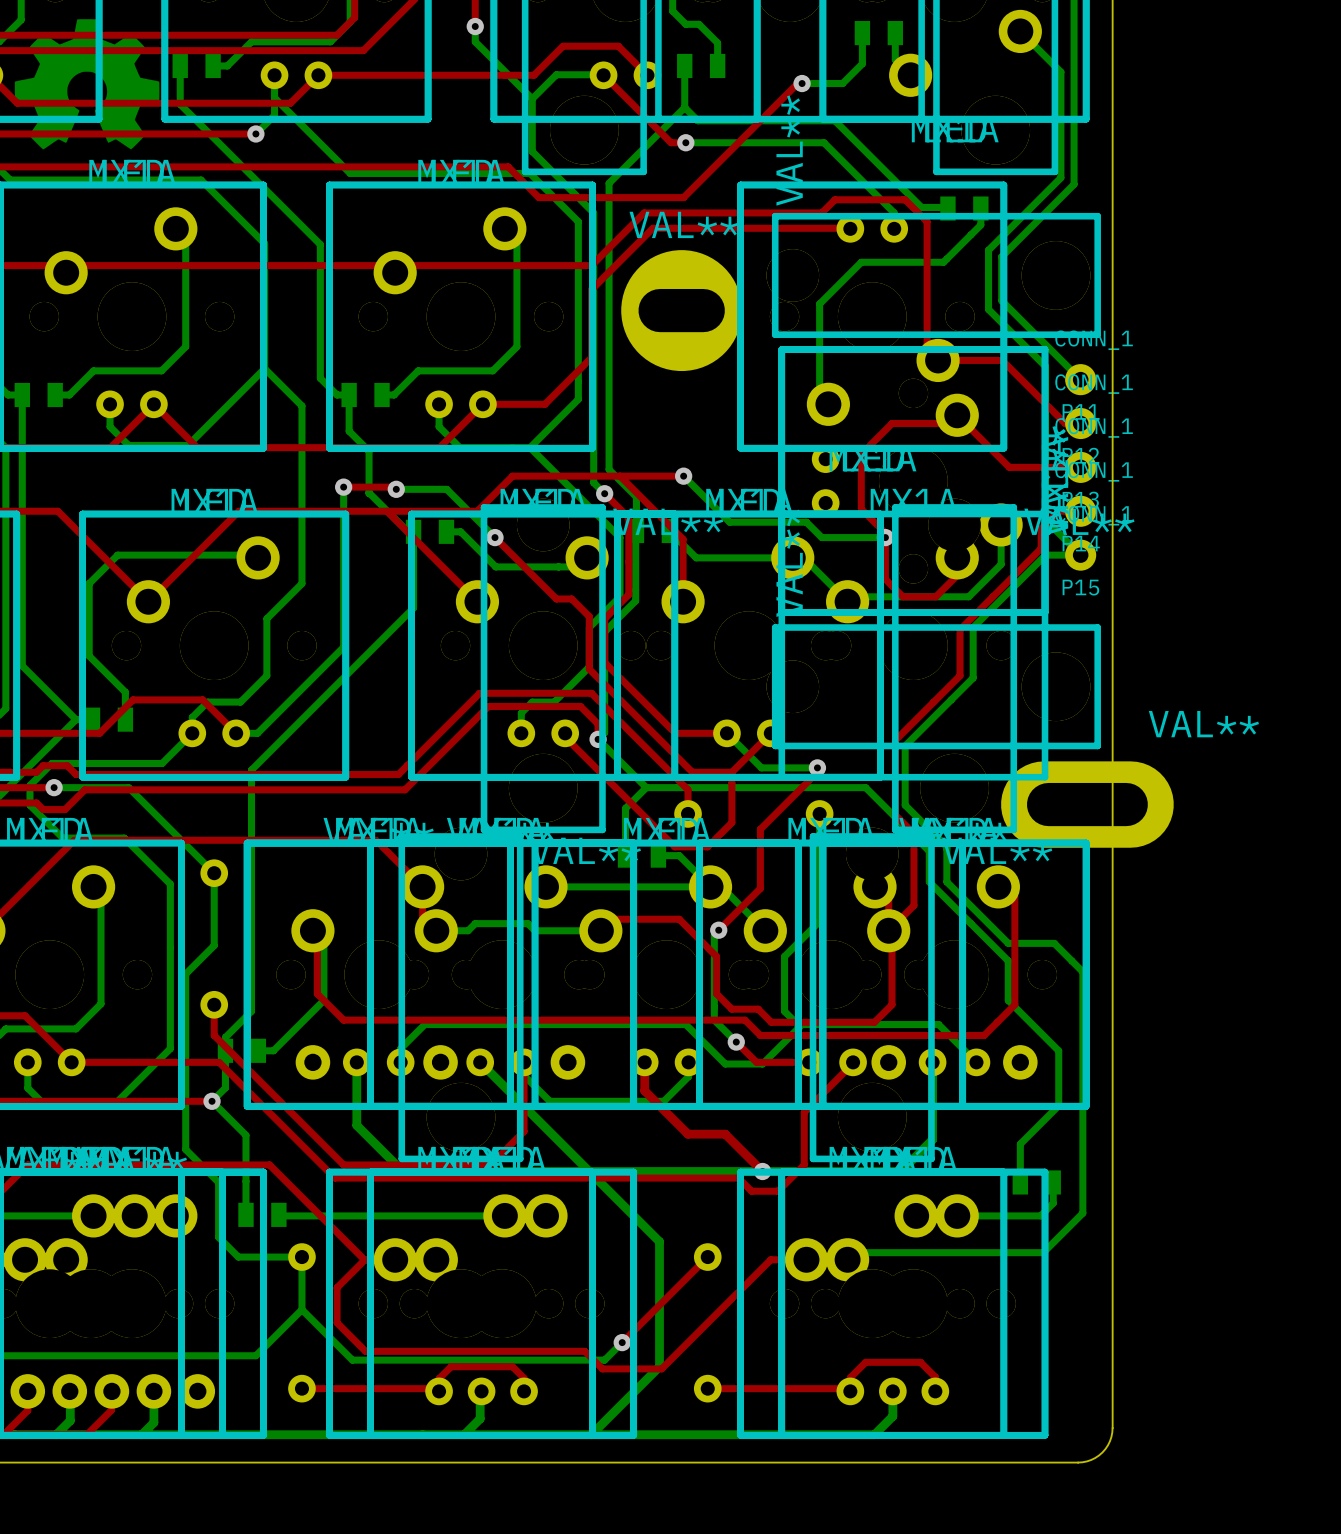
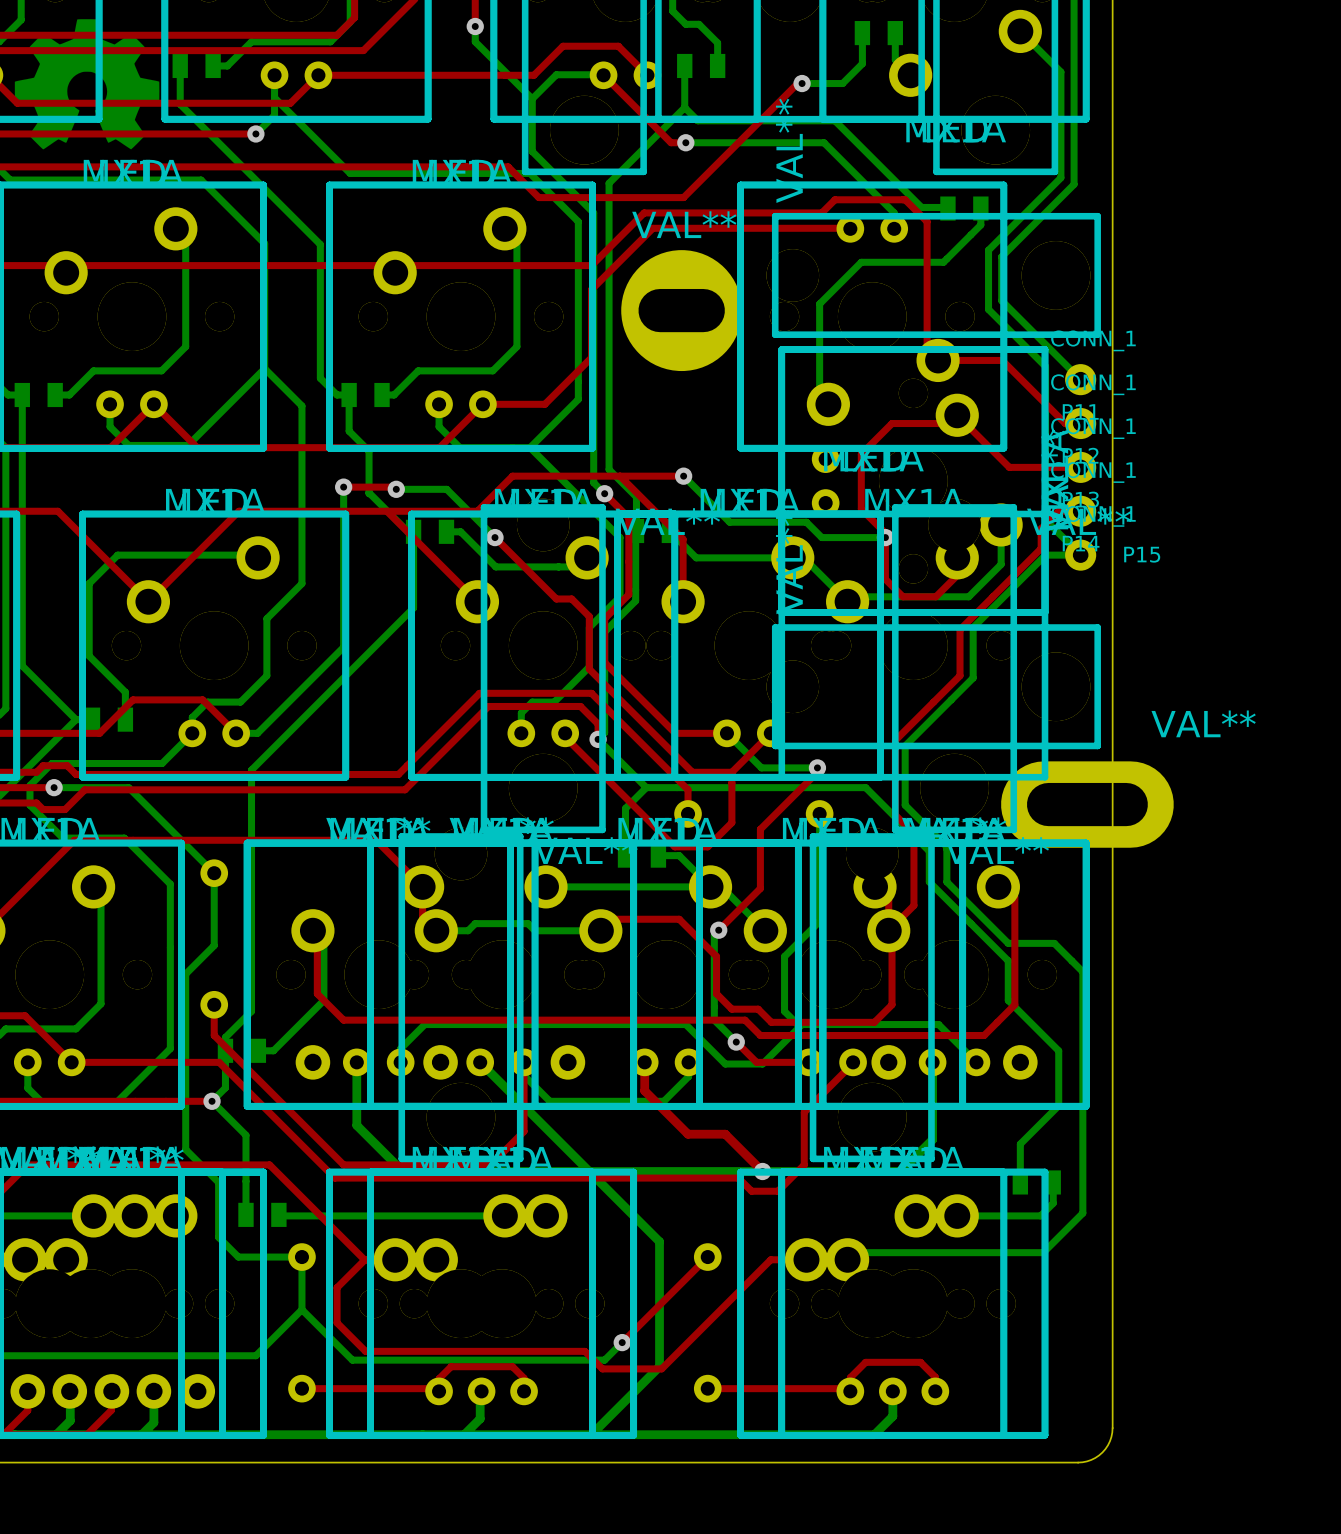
P15 name position: P15 (1080, 587) -> P15 (1142, 554)

